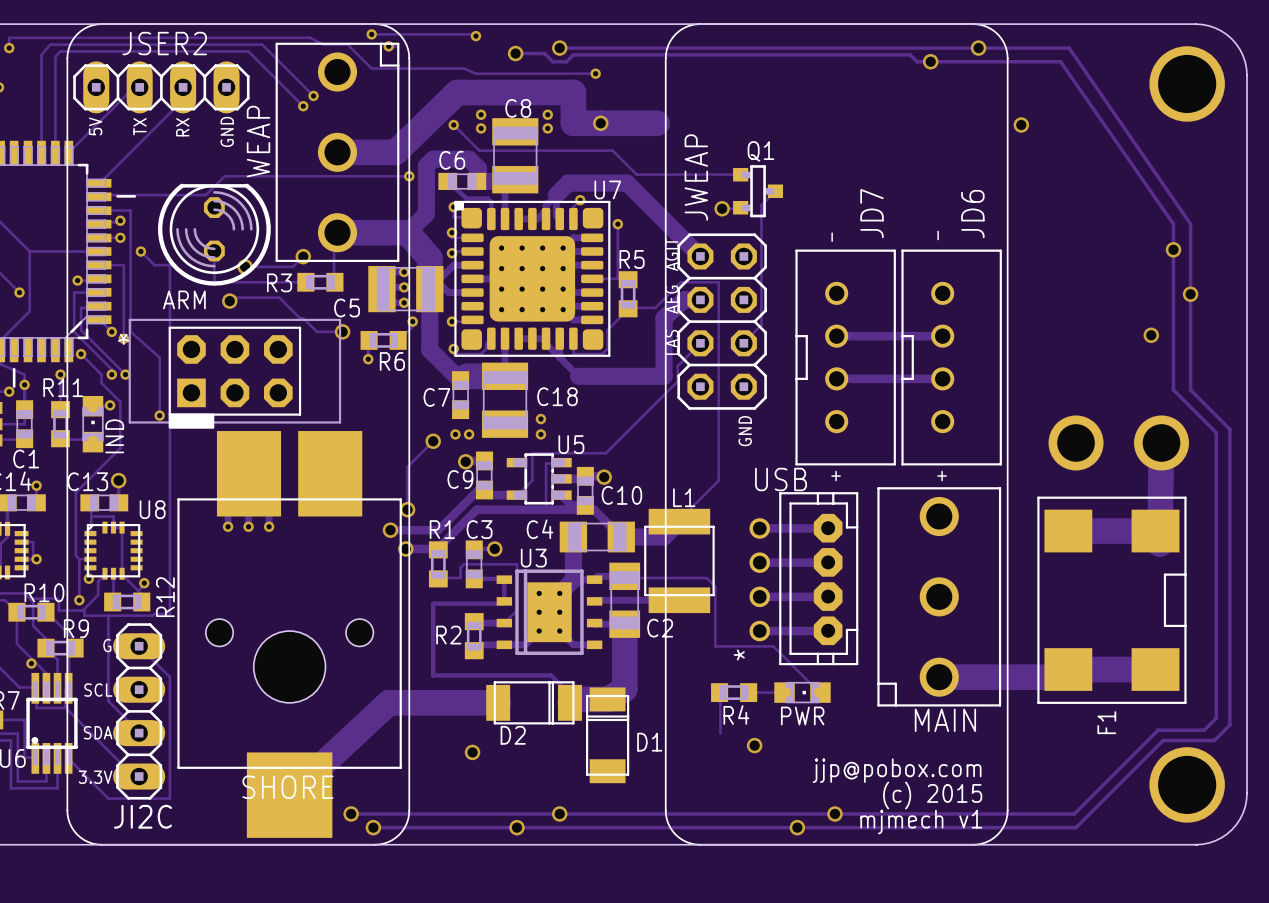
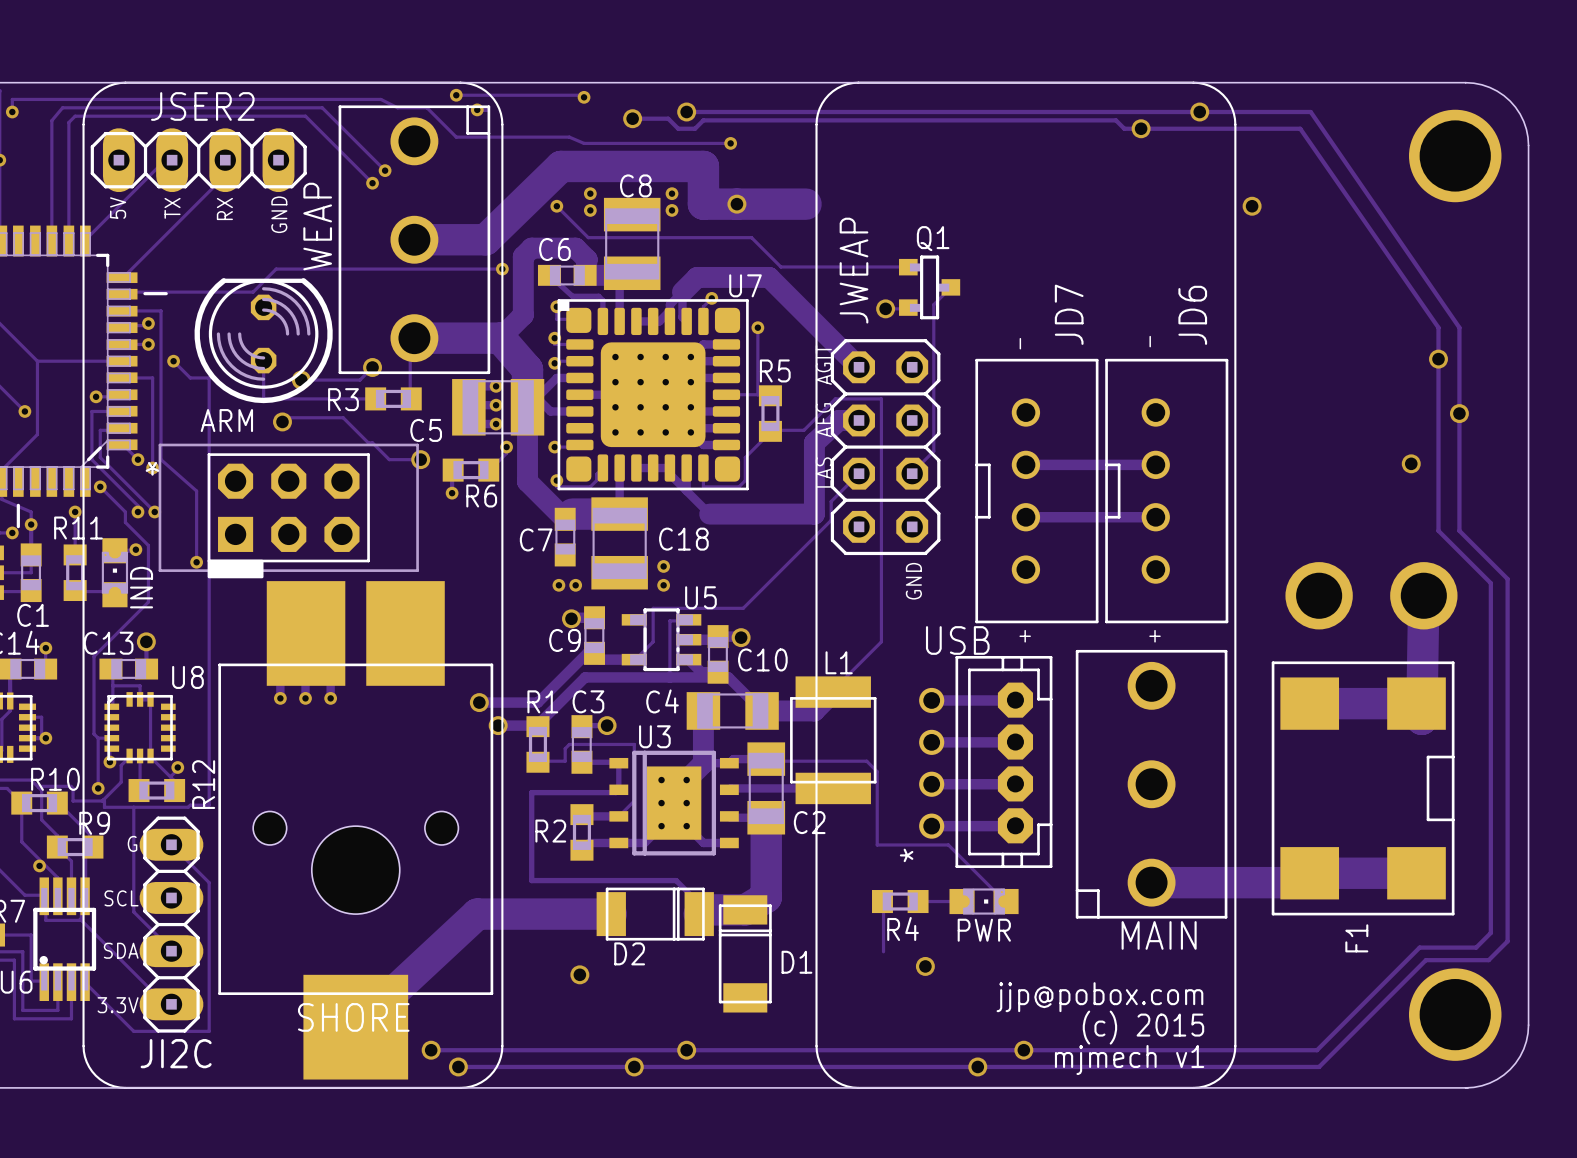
track: (433, 441) (407, 466) (407, 509) -> none
via: (433, 441) -> none
via: (407, 509) -> none

